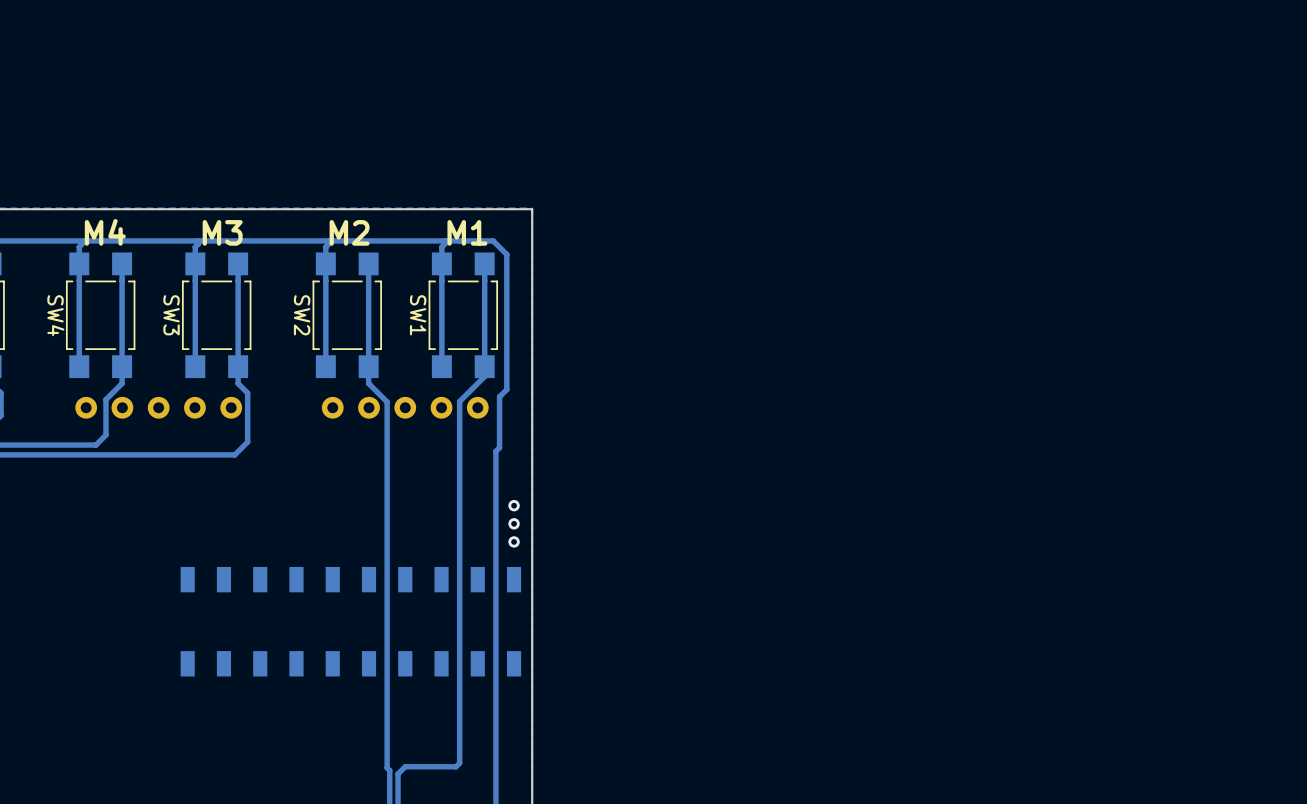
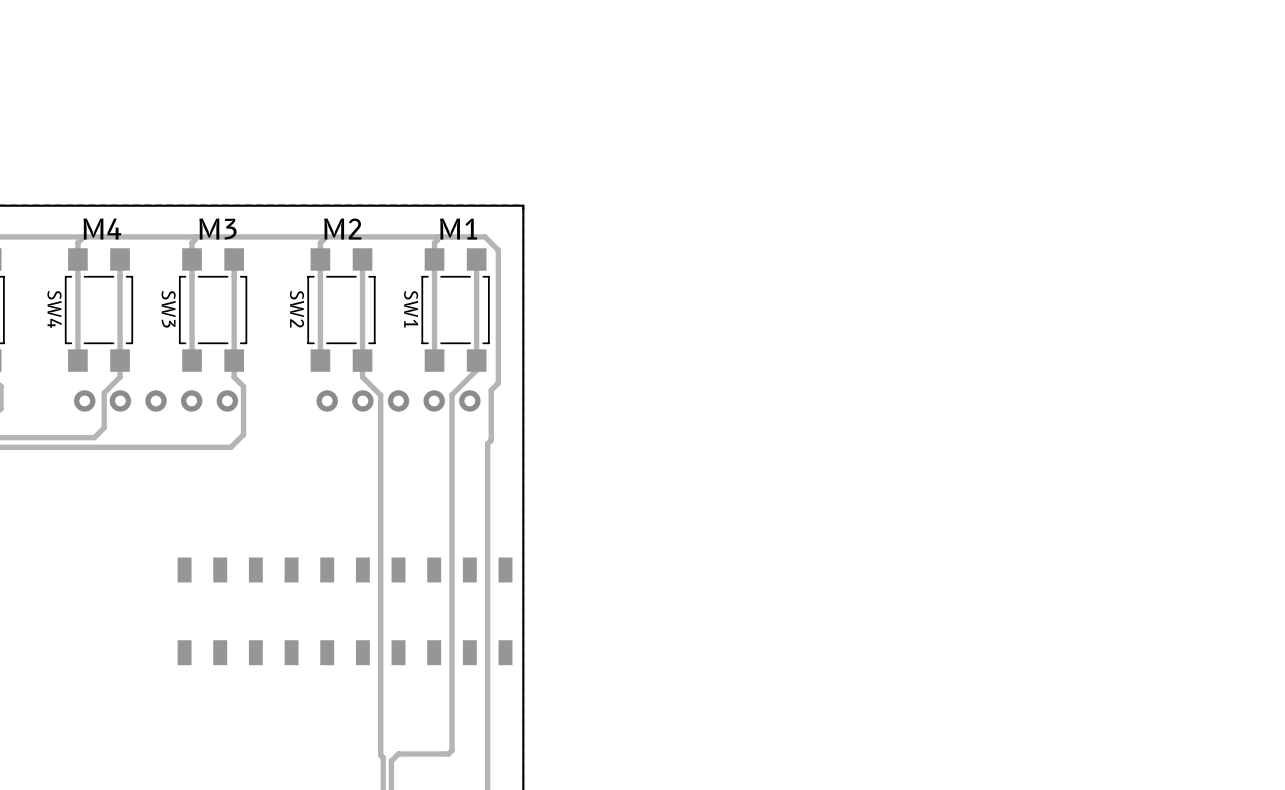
via: (514, 505) -> none
via: (514, 523) -> none
via: (514, 541) -> none

